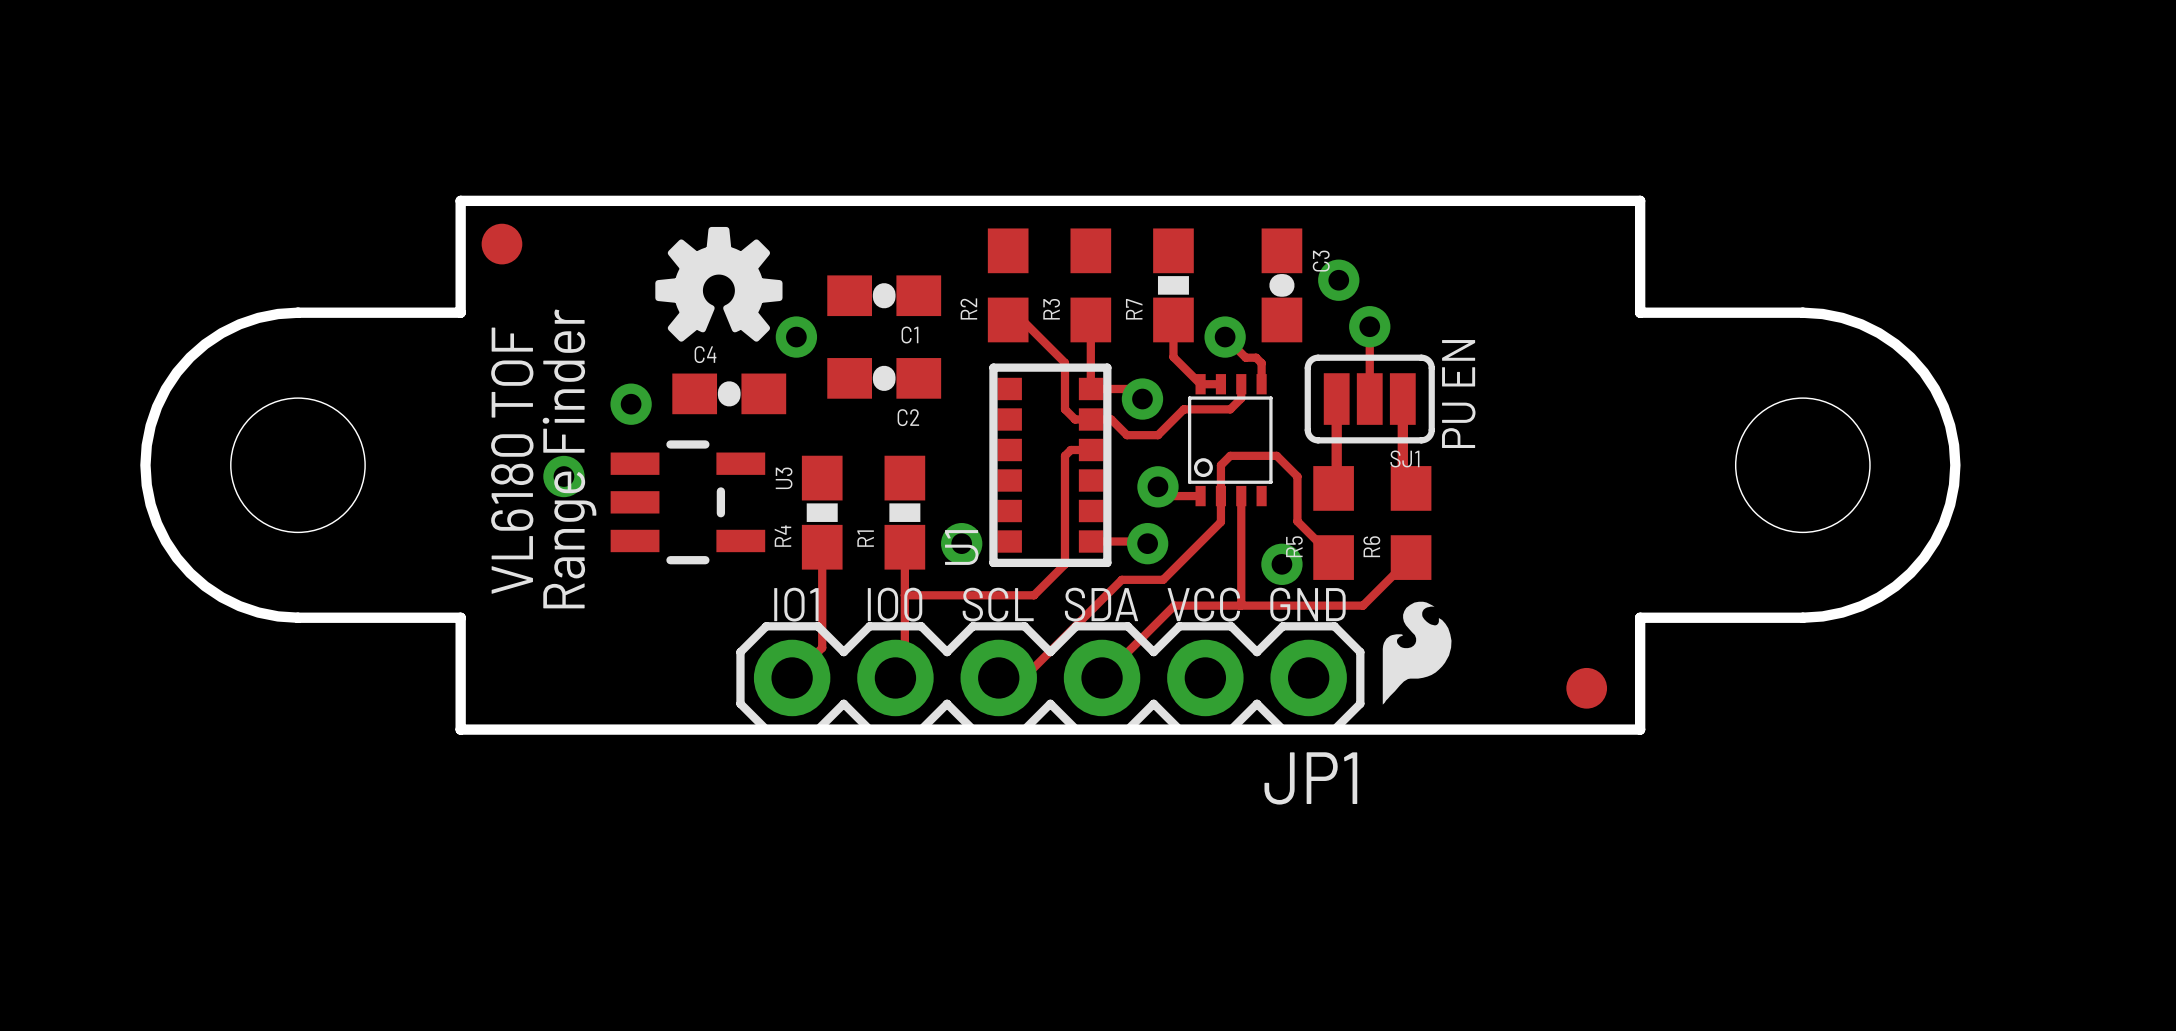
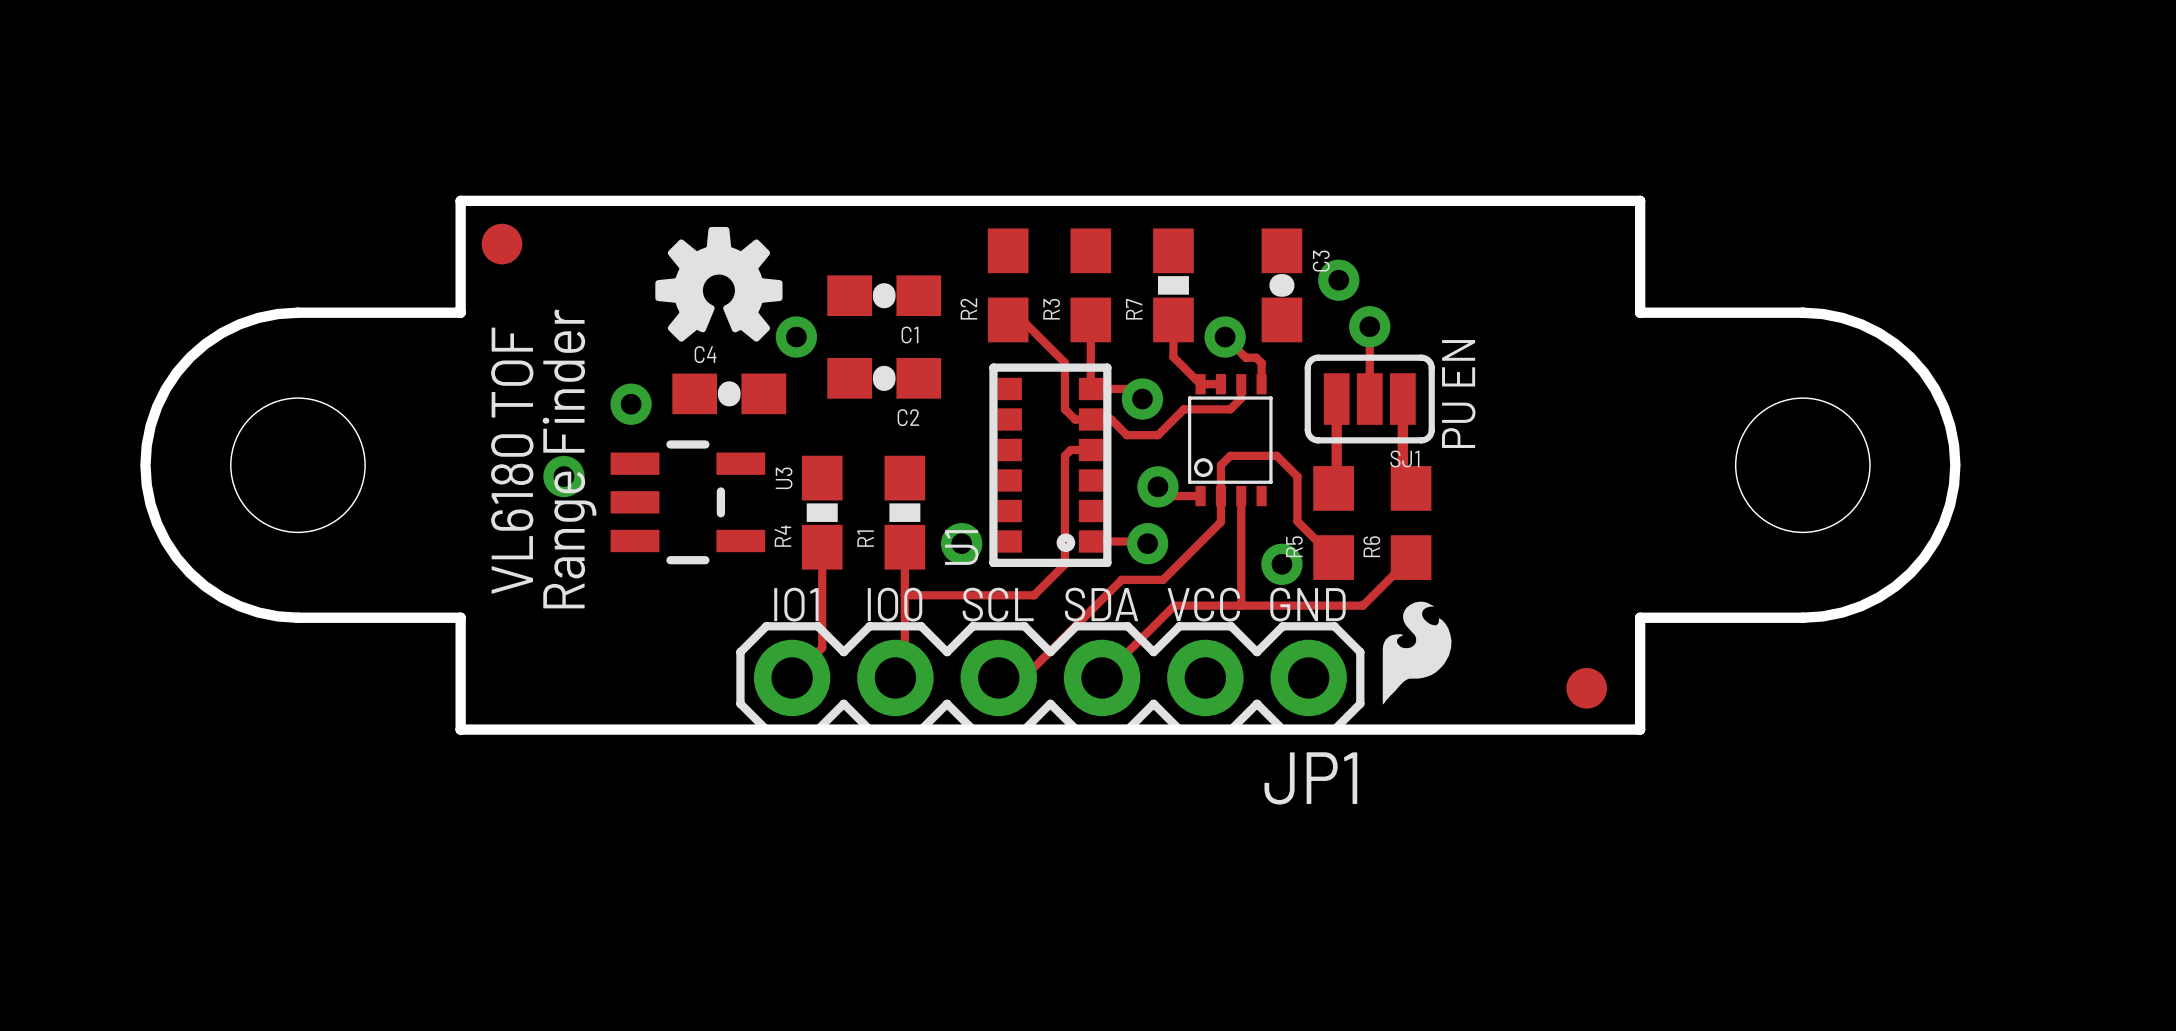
U1 footprint: [989, 363, 1112, 567] -> [989, 363, 1112, 567]

